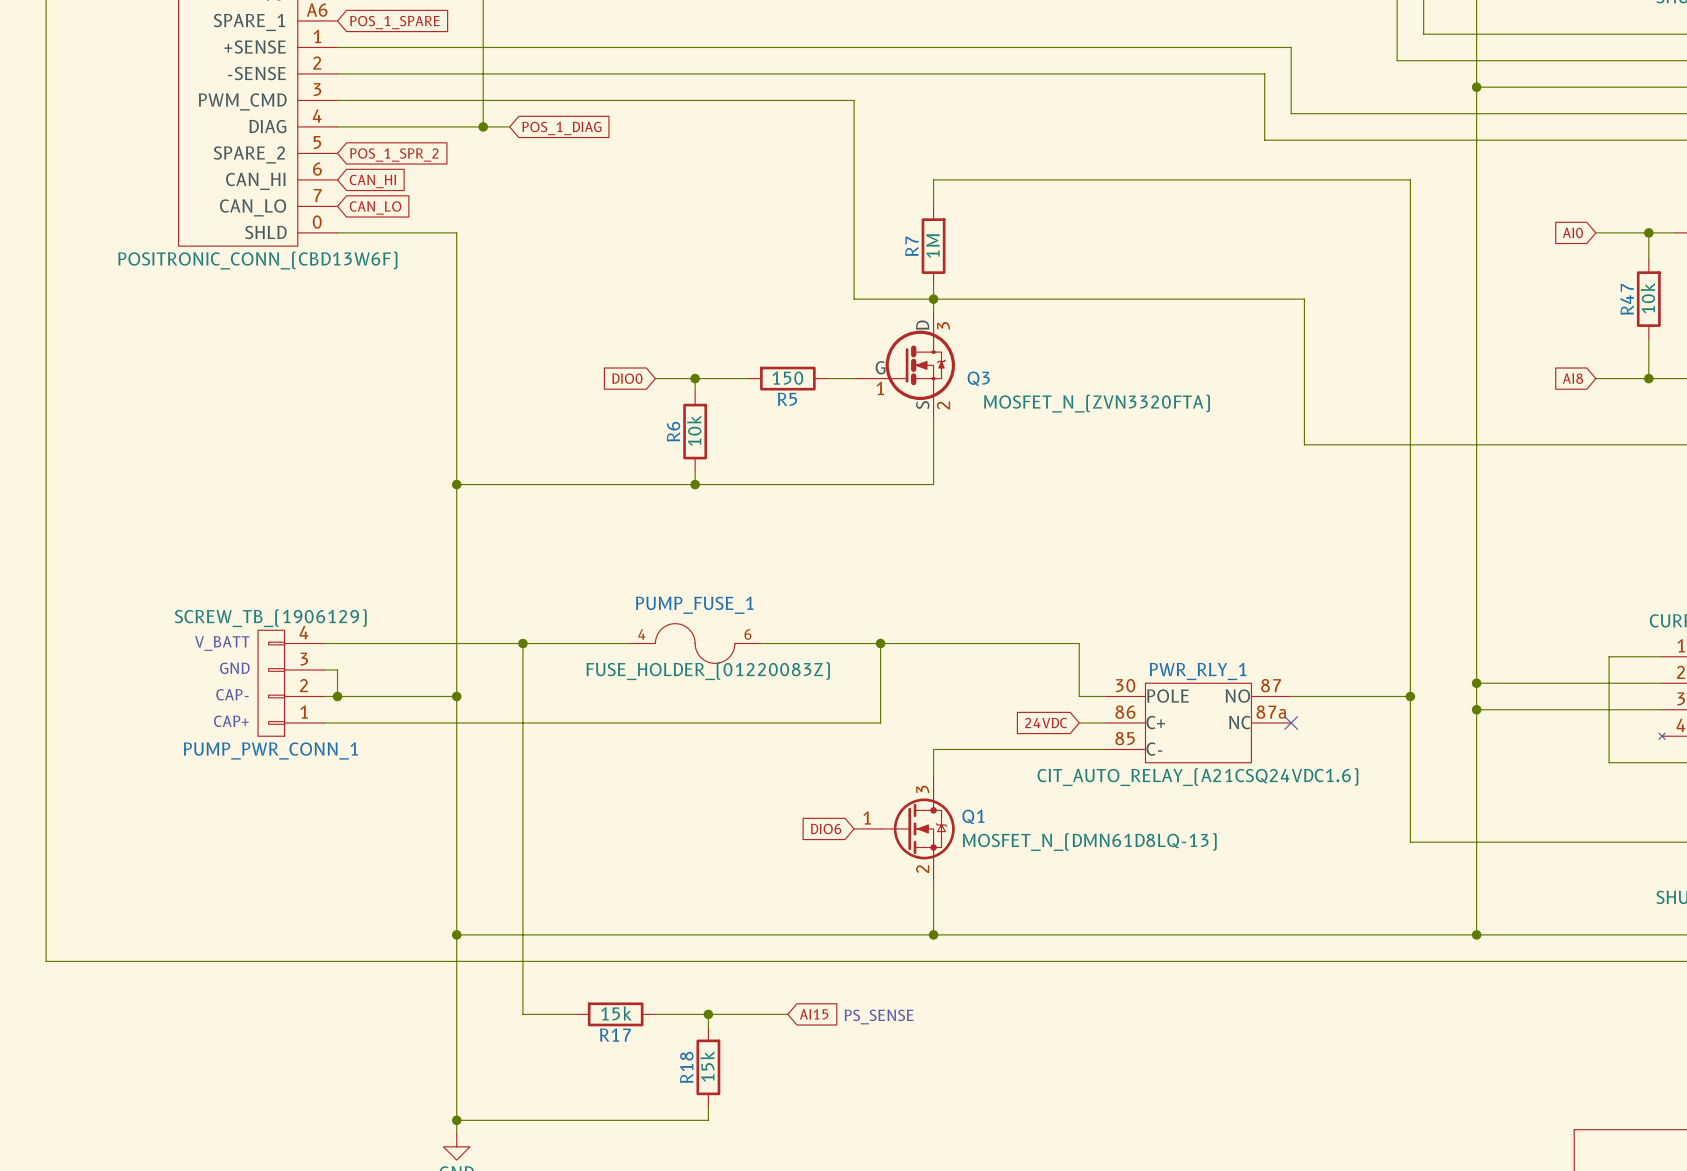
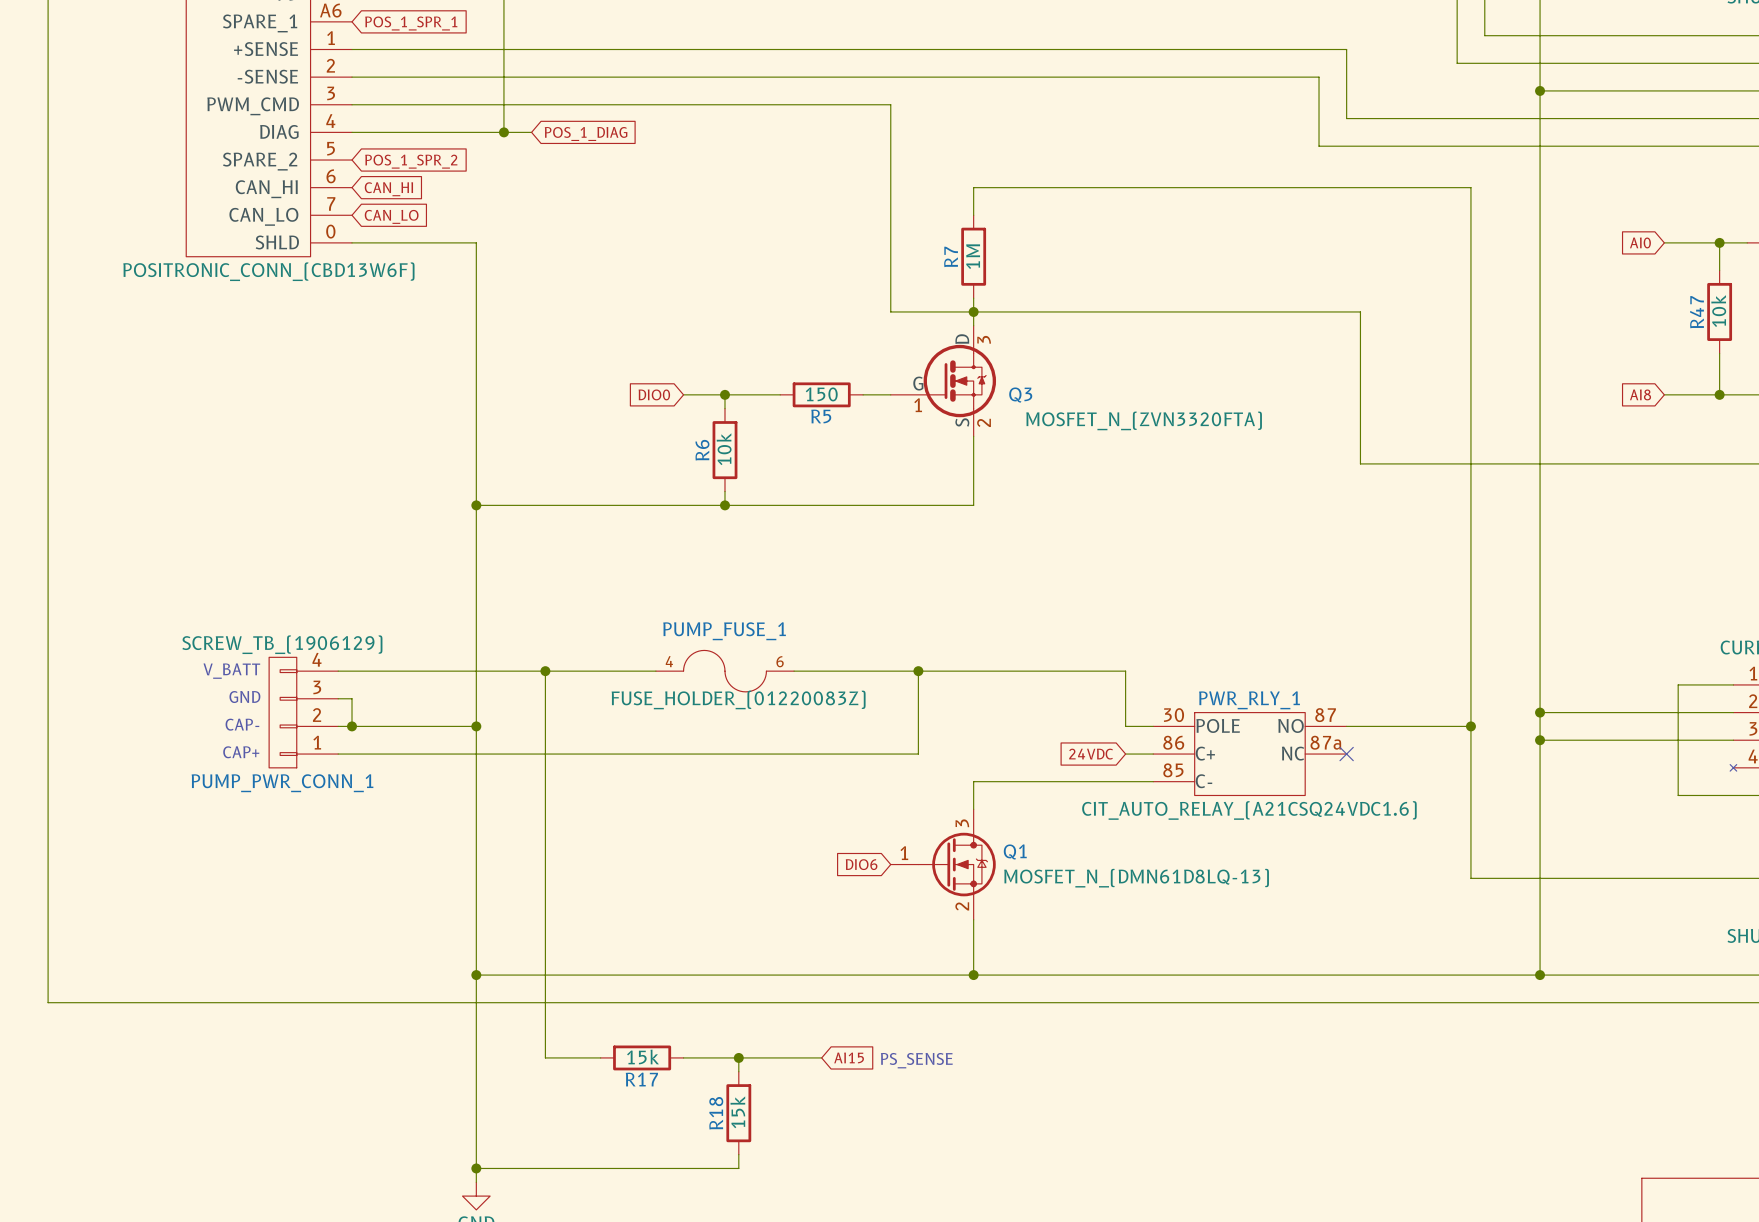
global label: POS_1_SPARE (395, 22) -> POS_1_SPR_1 (411, 23)

